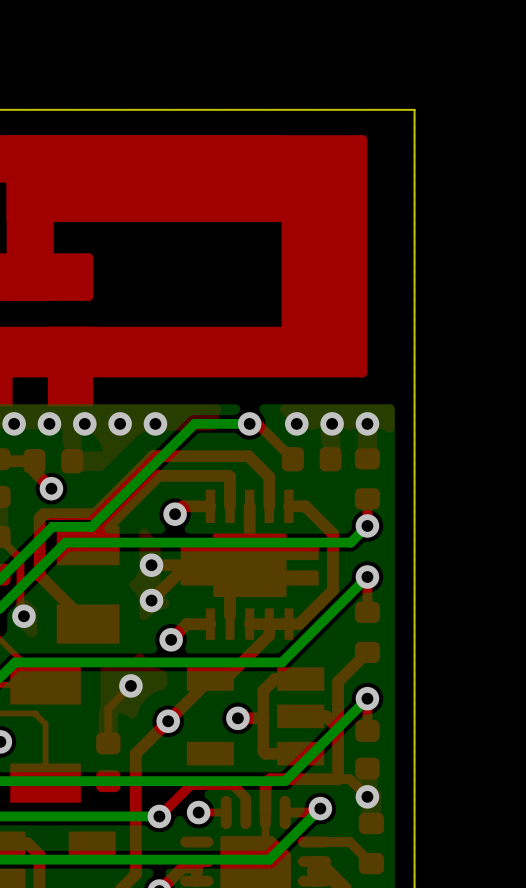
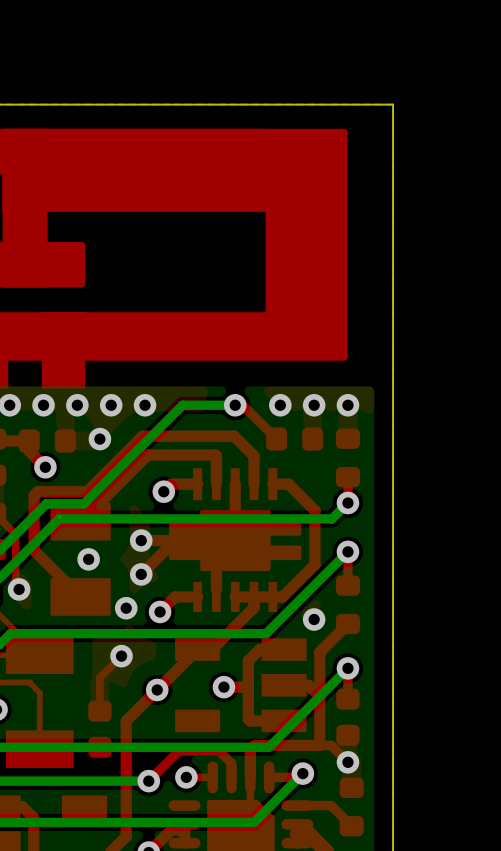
via: none -> (99, 439)
via: none -> (88, 559)
via: none -> (126, 608)
via: none -> (314, 619)

